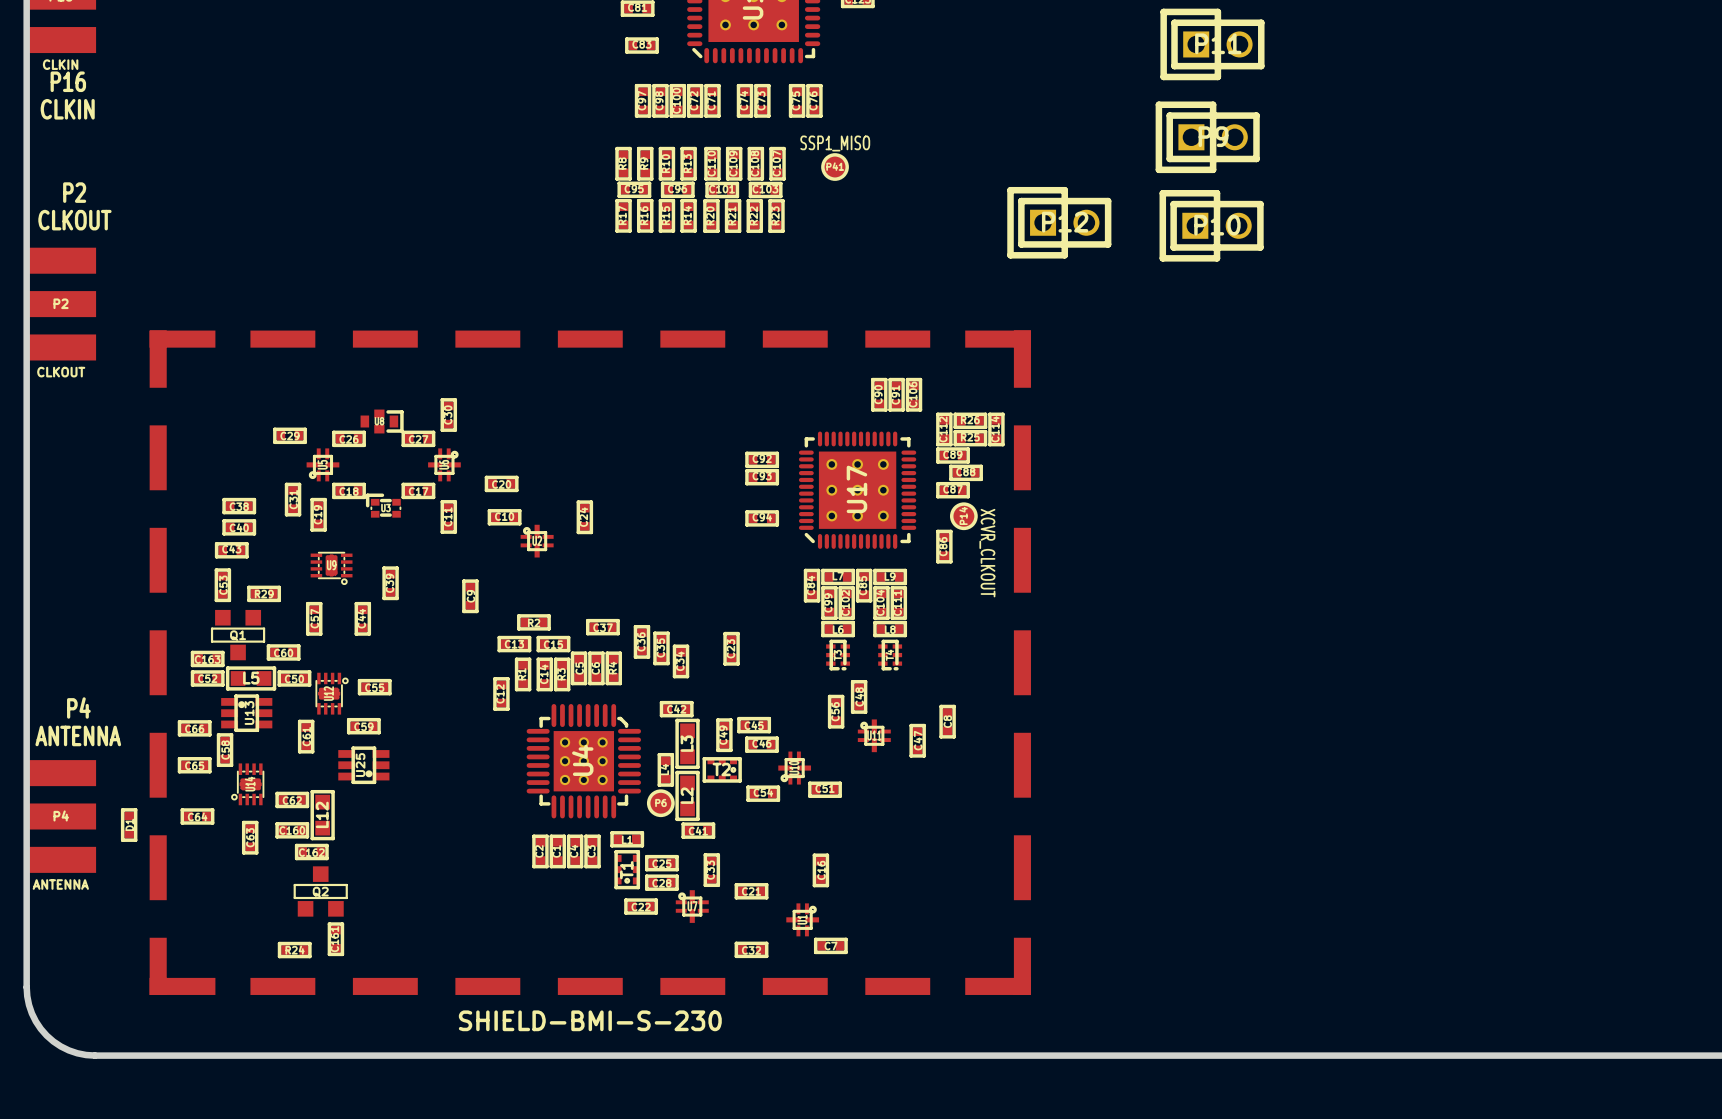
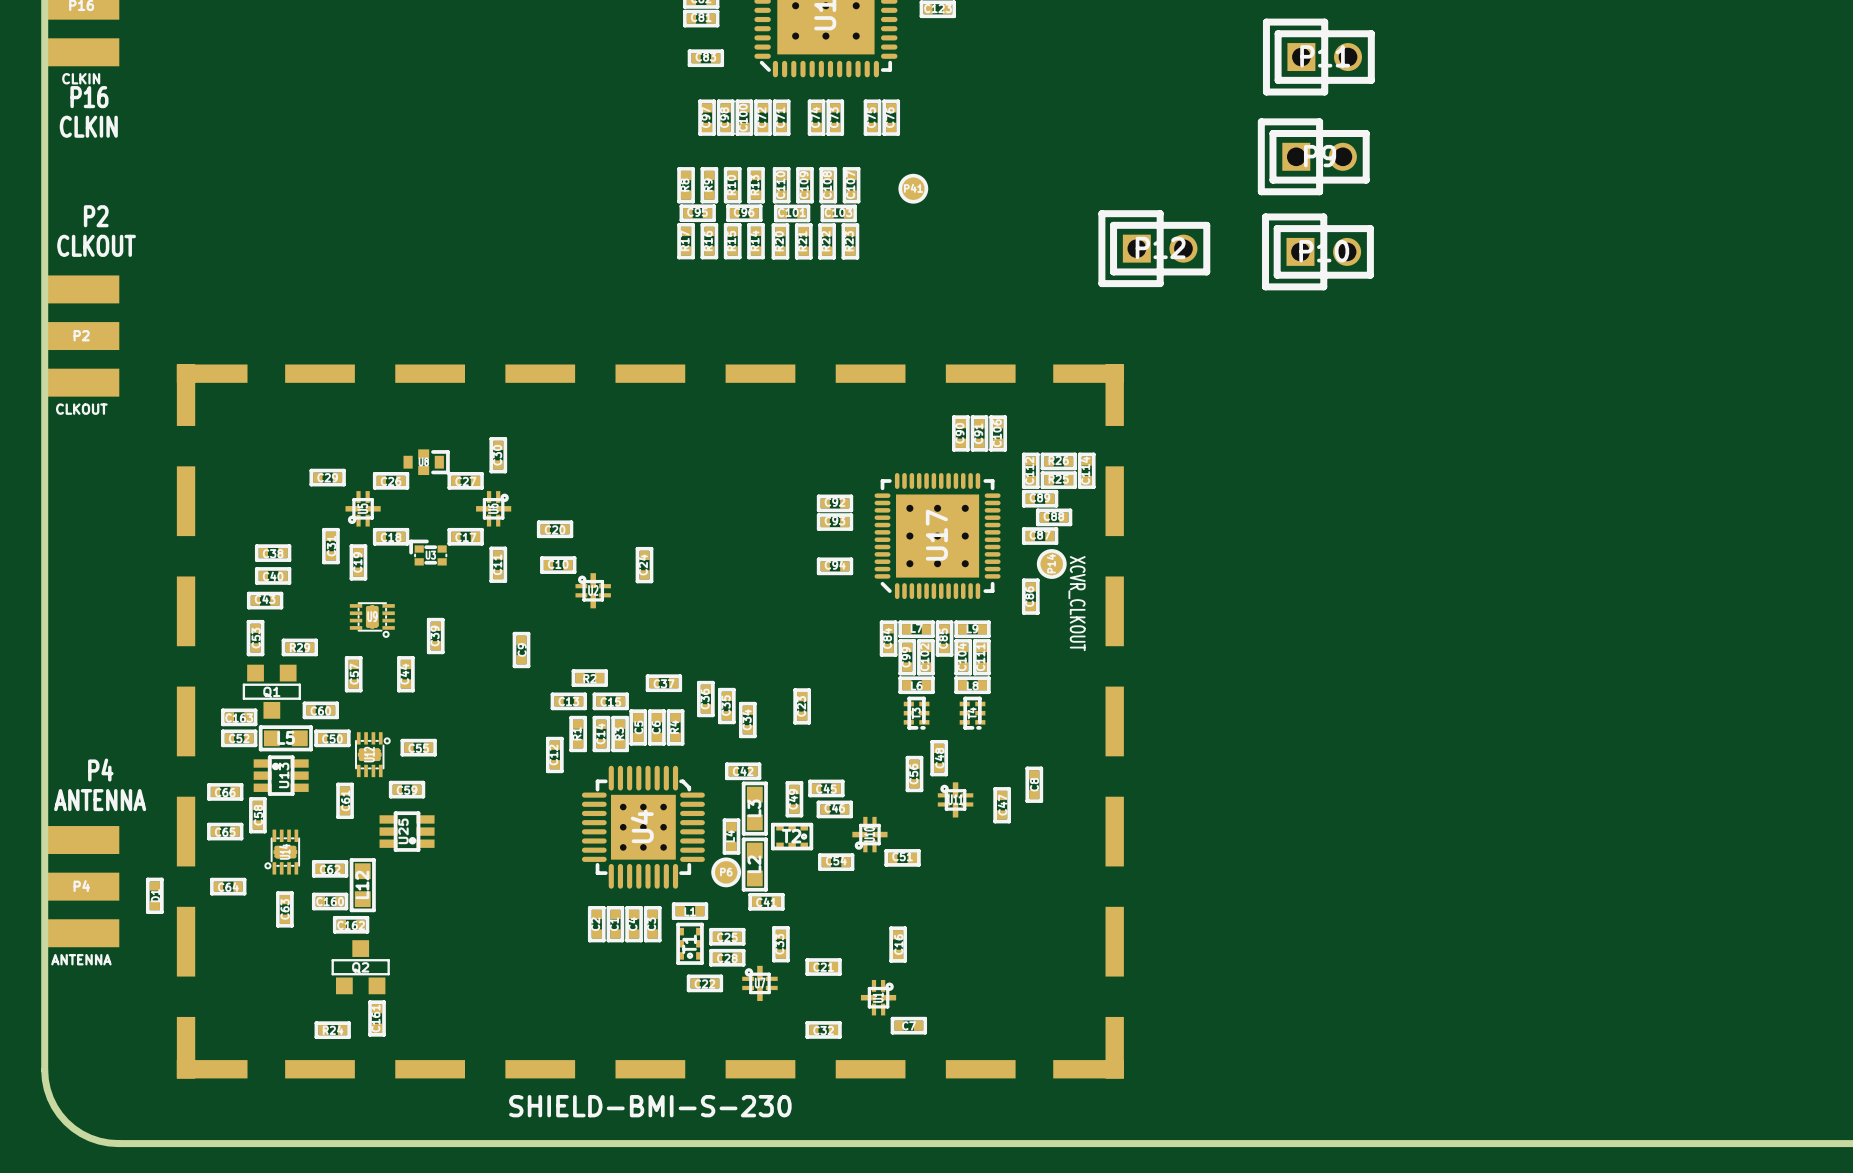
text: SSP1_MISO (835, 143) -> none

